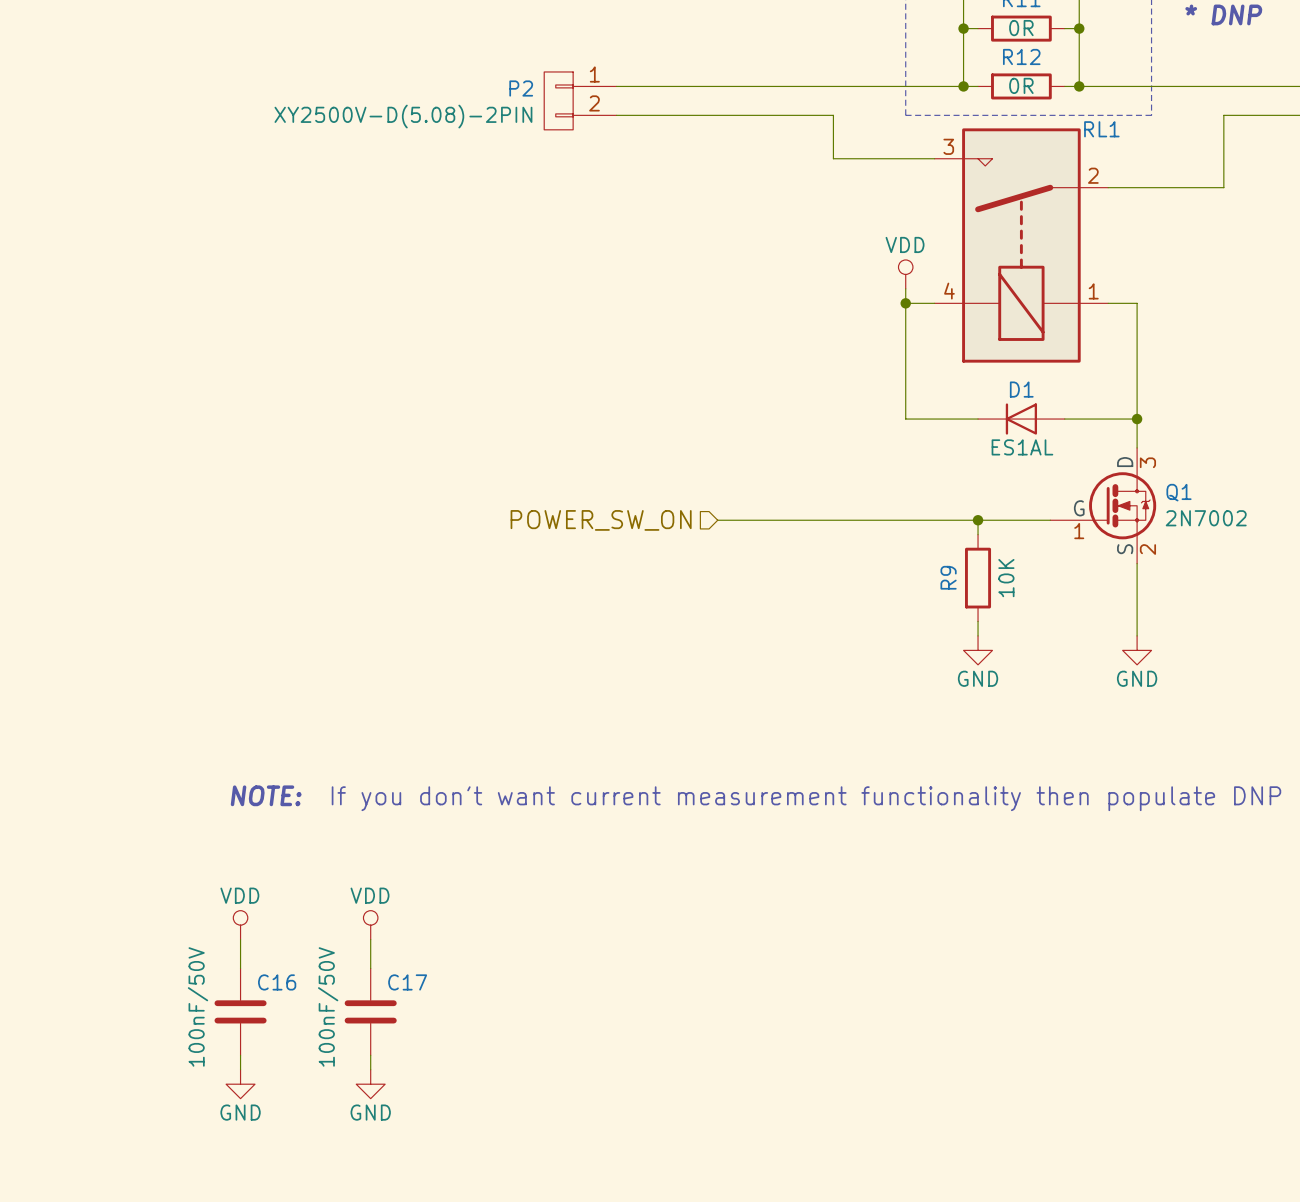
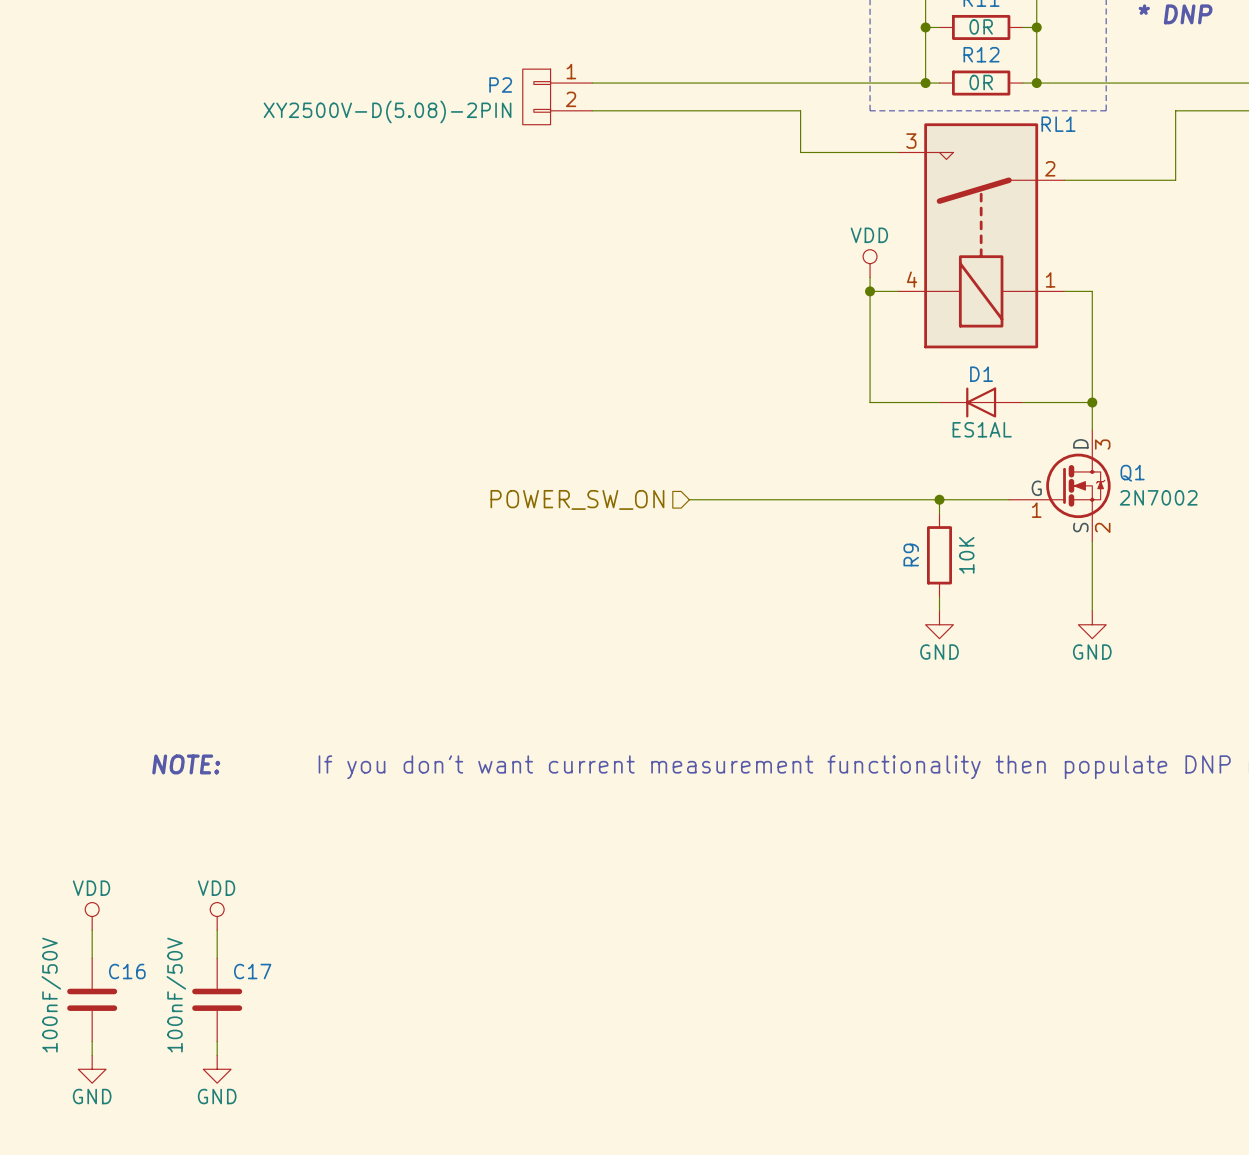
text position: NOTE: (266, 795) -> NOTE: (186, 764)
power symbol position: VDD (240, 925) -> VDD (217, 916)
power symbol: VDD (370, 925) -> none
wire: (240, 939) (240, 968) -> (92, 930) (92, 958)
wire: (370, 939) (370, 968) -> (217, 930) (217, 958)
power symbol: none -> VDD (92, 916)
C16 position: (240, 1011) -> (92, 999)
C17 position: (370, 1011) -> (217, 999)
wire: (240, 1055) (240, 1069) -> (92, 1041) (92, 1055)
wire: (370, 1055) (370, 1069) -> (217, 1041) (217, 1055)
power symbol position: GND (240, 1084) -> GND (217, 1069)
power symbol: GND (370, 1084) -> none
power symbol: none -> GND (92, 1069)

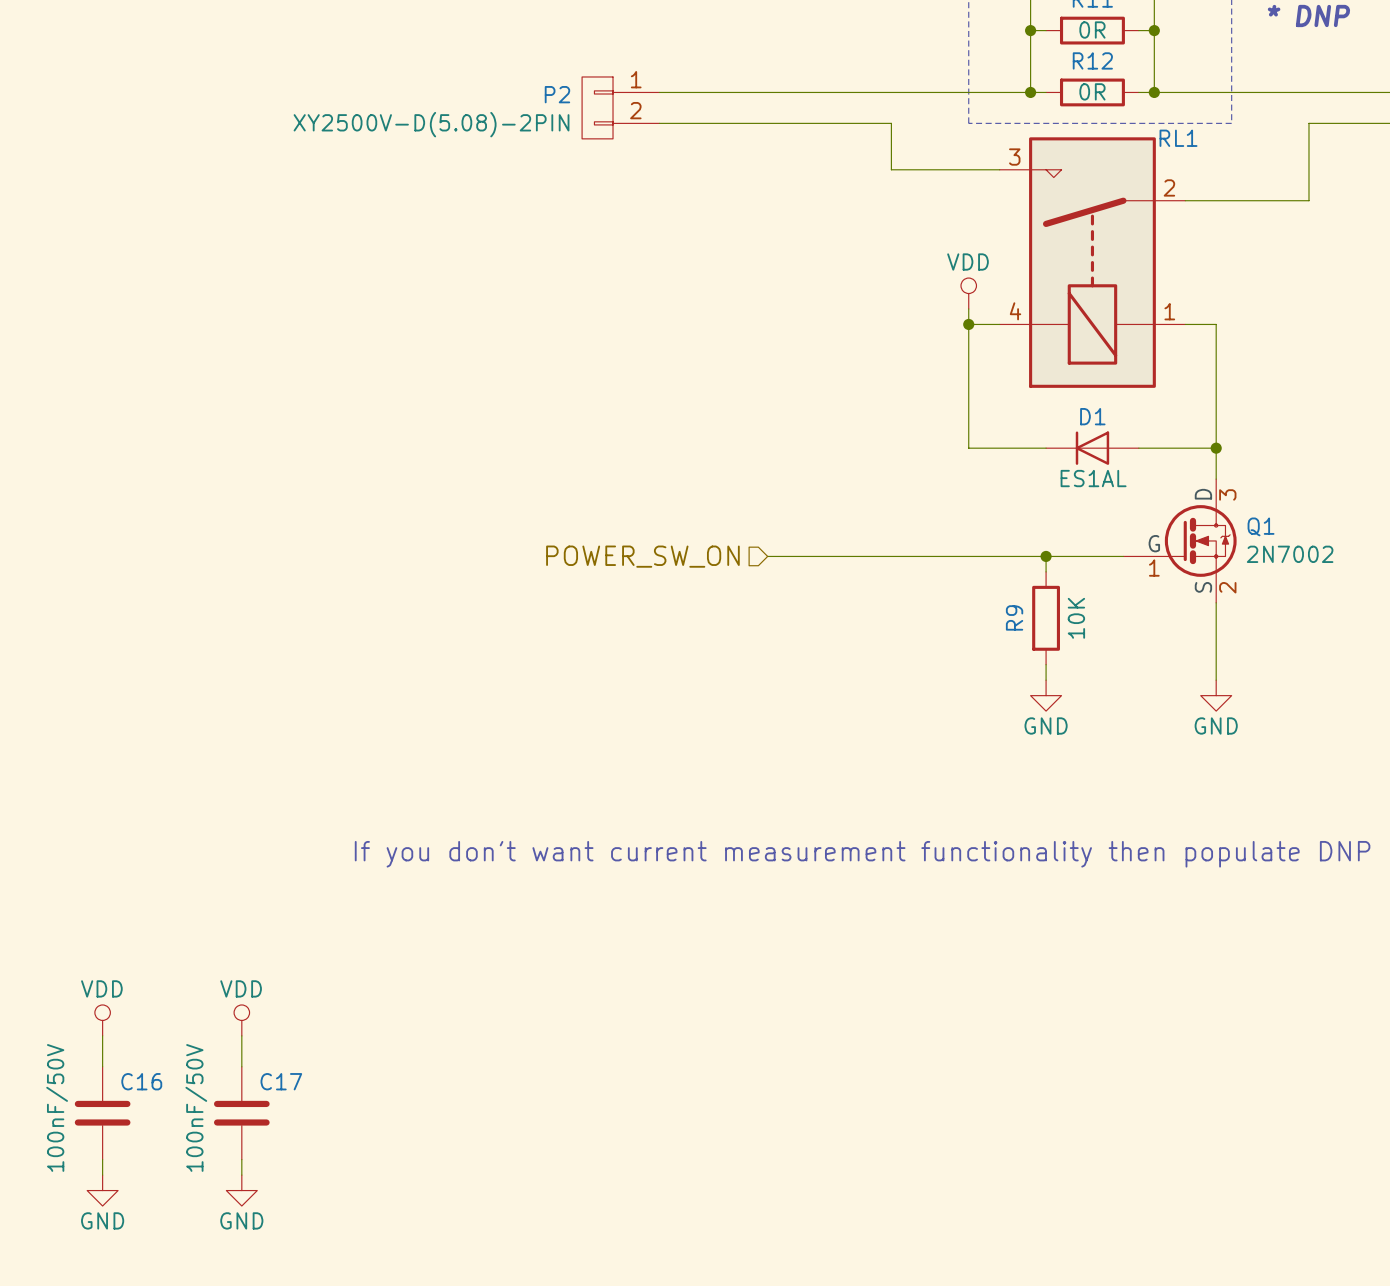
text: NOTE: (186, 764) -> none

